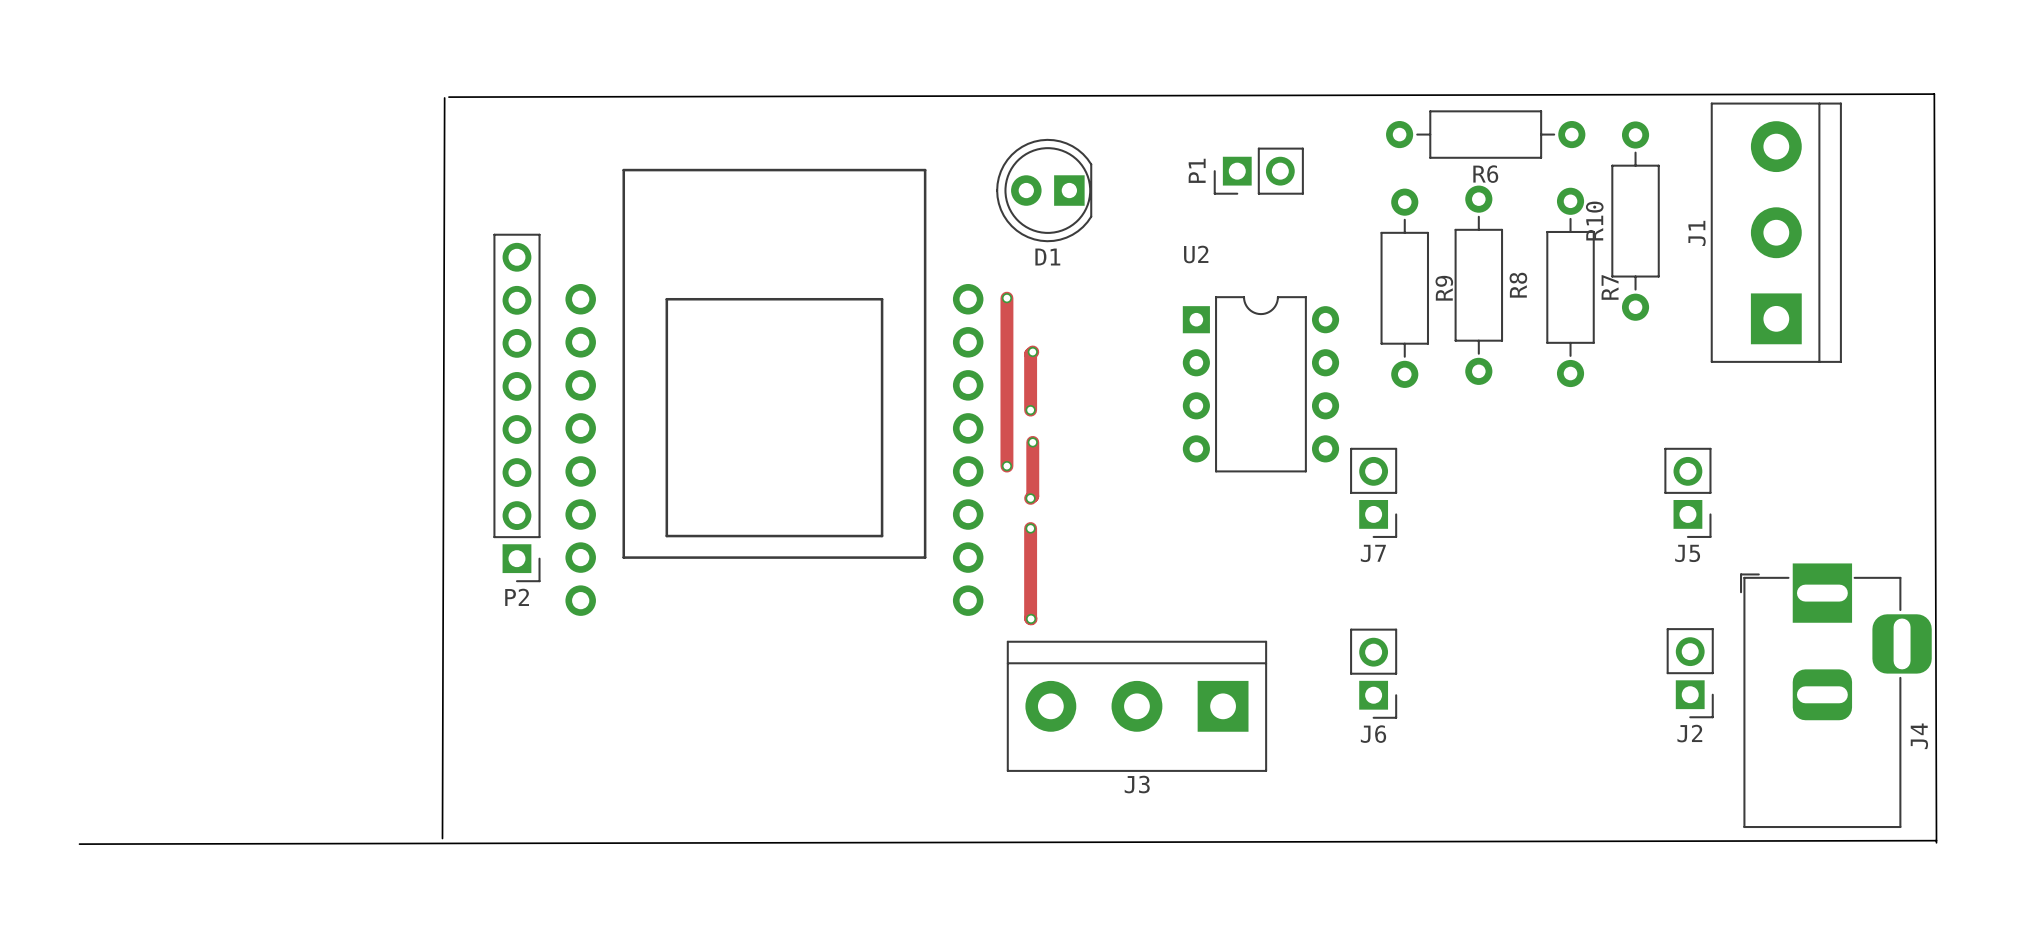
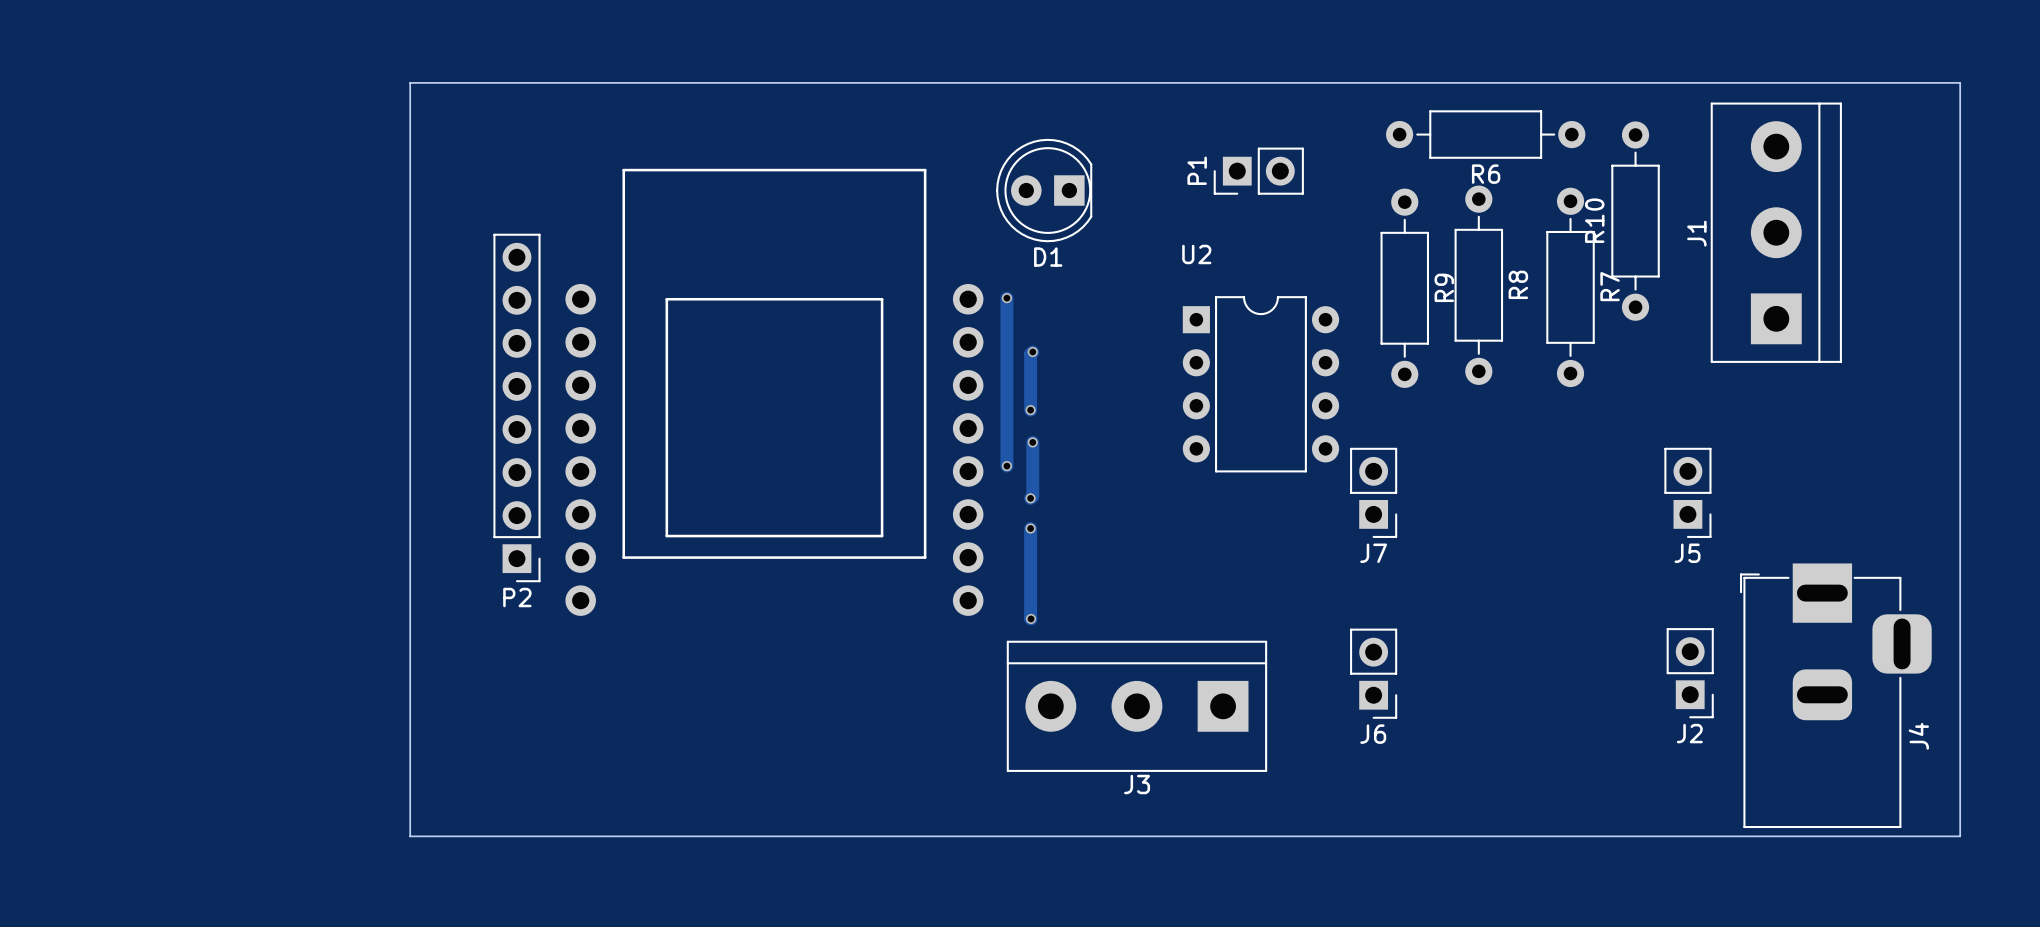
board edge: none -> (410, 82) (410, 836) (1960, 836) (1960, 82) (410, 82)
board edge: (444, 97) (442, 838) -> none
board edge: (448, 97) (1934, 94) (1936, 842) -> none
board edge: (1936, 840) (79, 844) -> none

